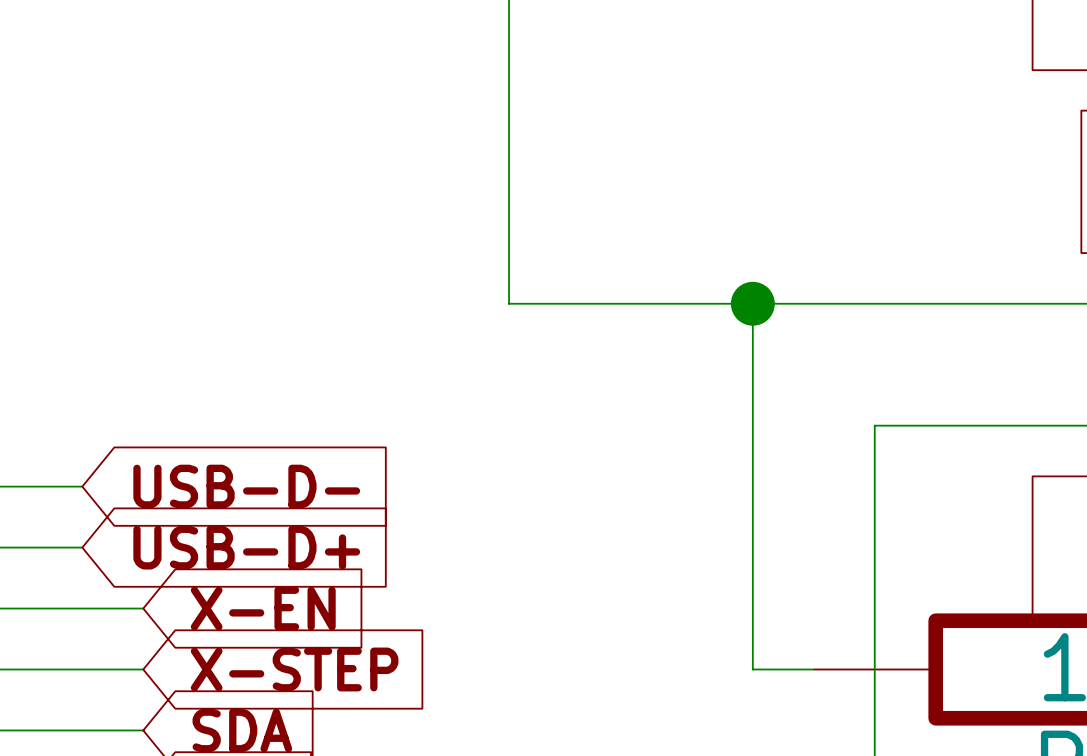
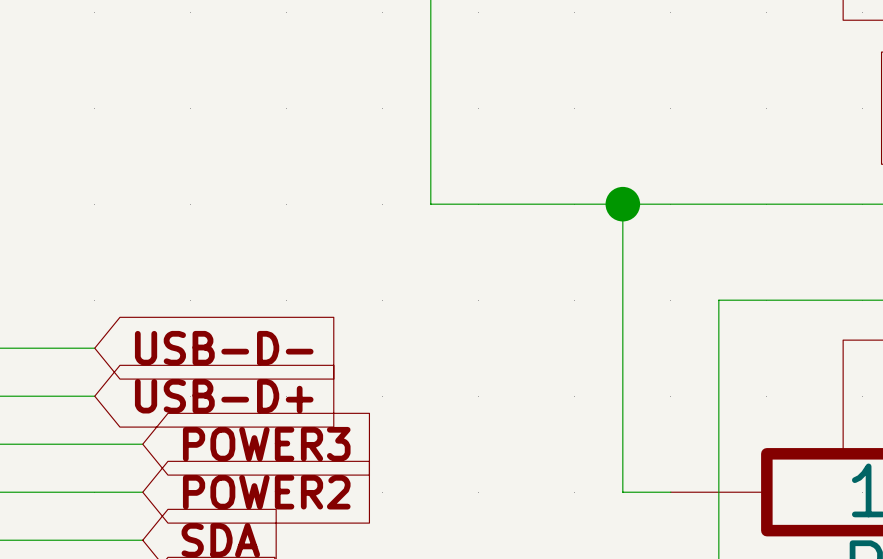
global label: X-EN (263, 608) -> POWER3 (266, 444)
global label: X-STEP (294, 669) -> POWER2 (266, 492)

